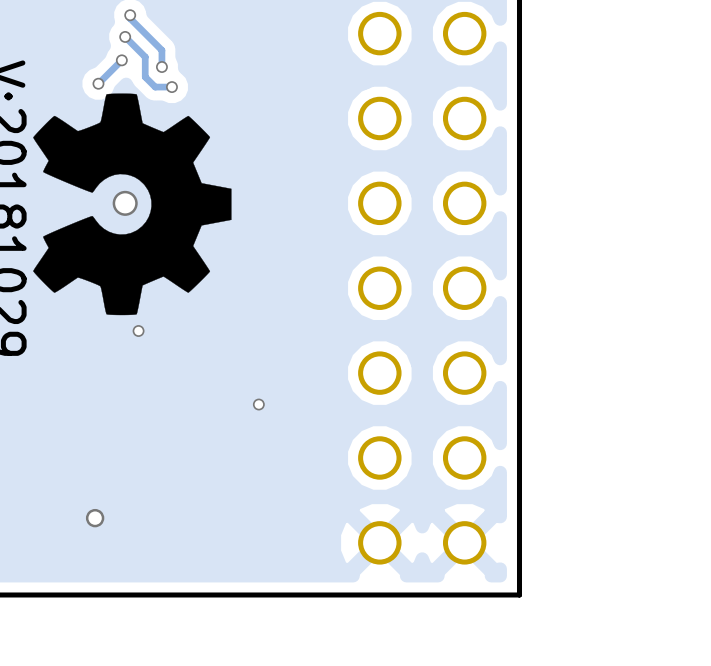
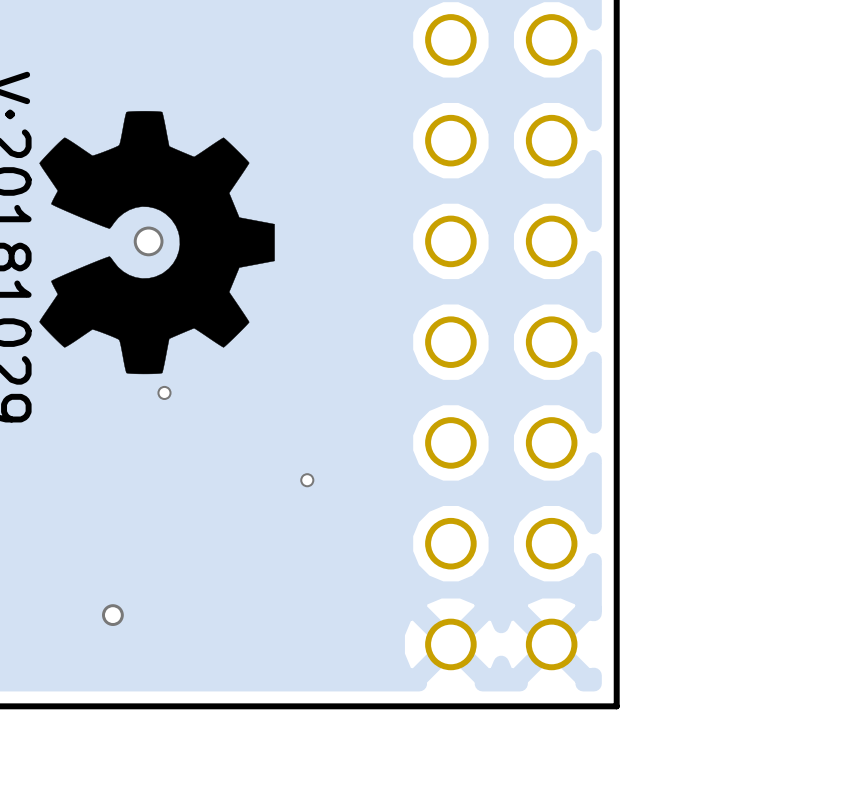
track: (130, 15) (130, 18) (161, 50) (161, 67) -> none
via: (130, 15) -> none
track: (125, 36) (145, 56) (145, 77) (155, 87) (171, 87) -> none
via: (125, 36) -> none
track: (121, 60) (98, 83) -> none
via: (121, 60) -> none
via: (161, 67) -> none
via: (98, 83) -> none
via: (171, 87) -> none

